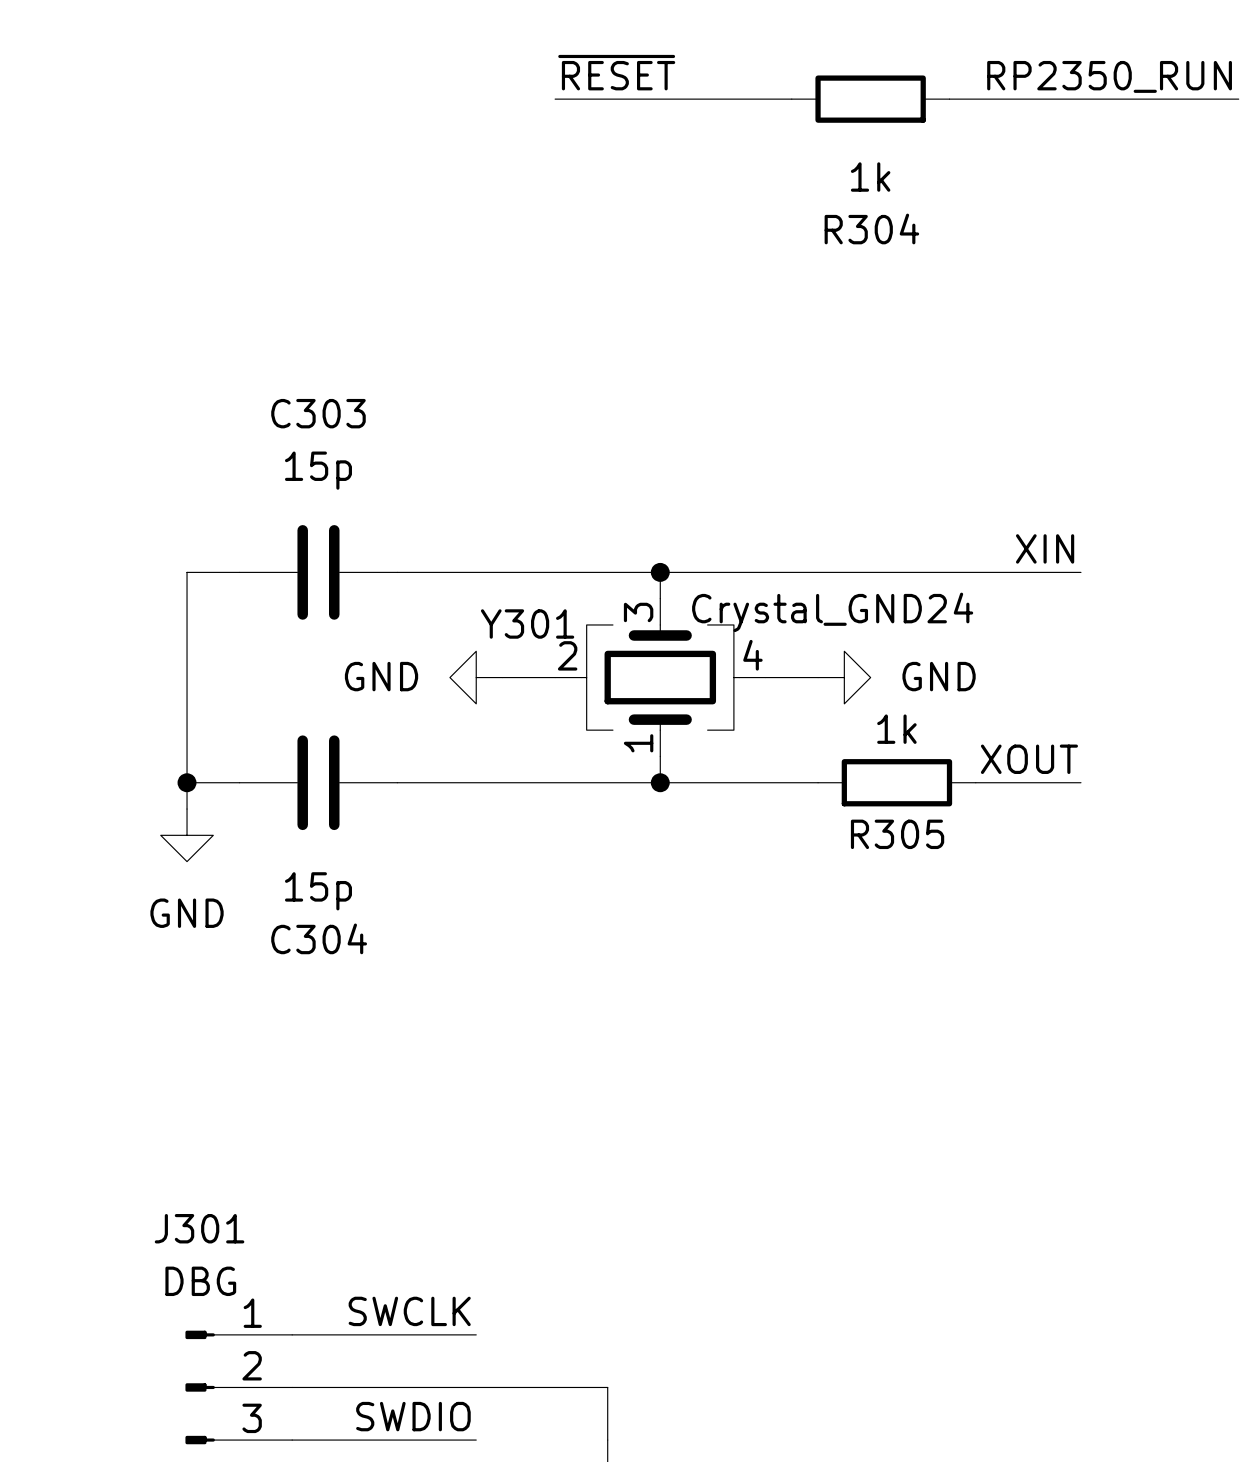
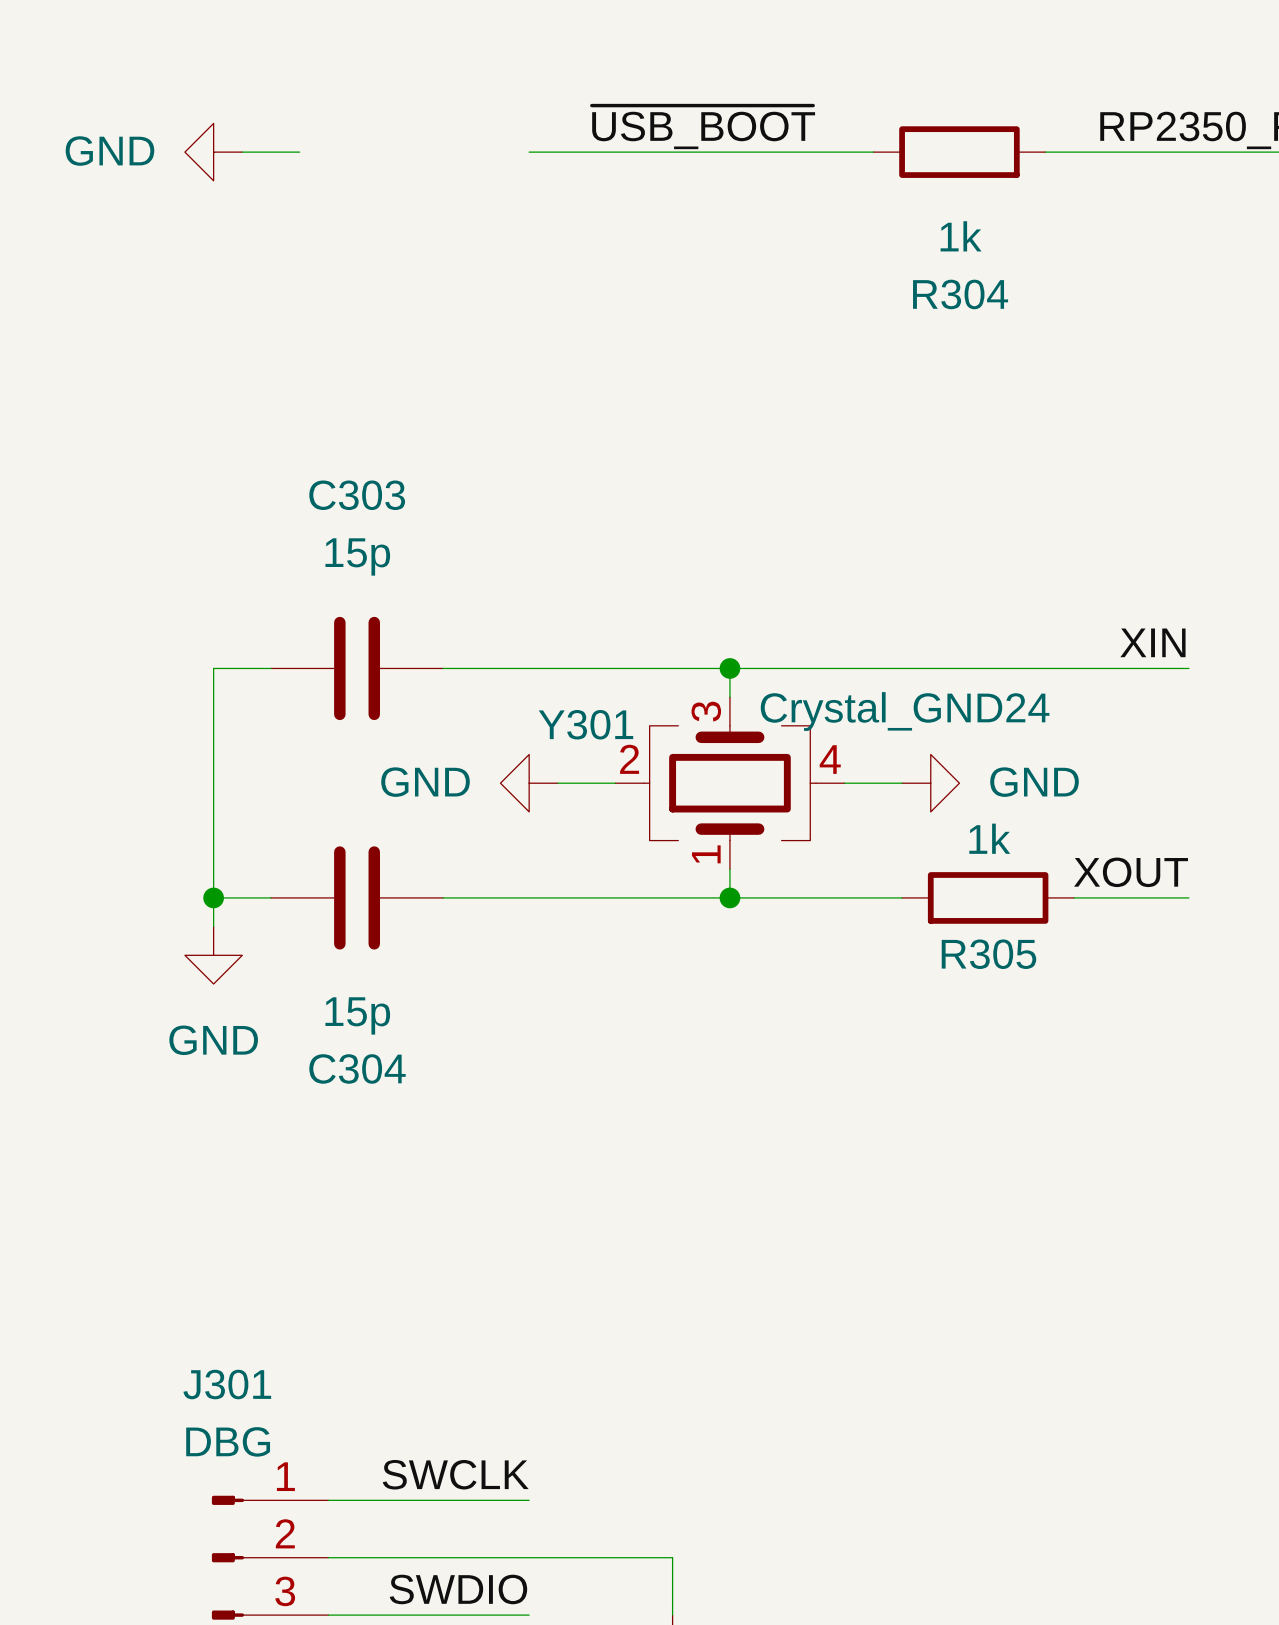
label: ~{RESET} (616, 72) -> none
label: none -> ~{USB_BOOT} (703, 127)
power symbol: none -> GND (213, 152)
wire: none -> (242, 152) (299, 152)
wire: none -> (529, 152) (615, 152)

